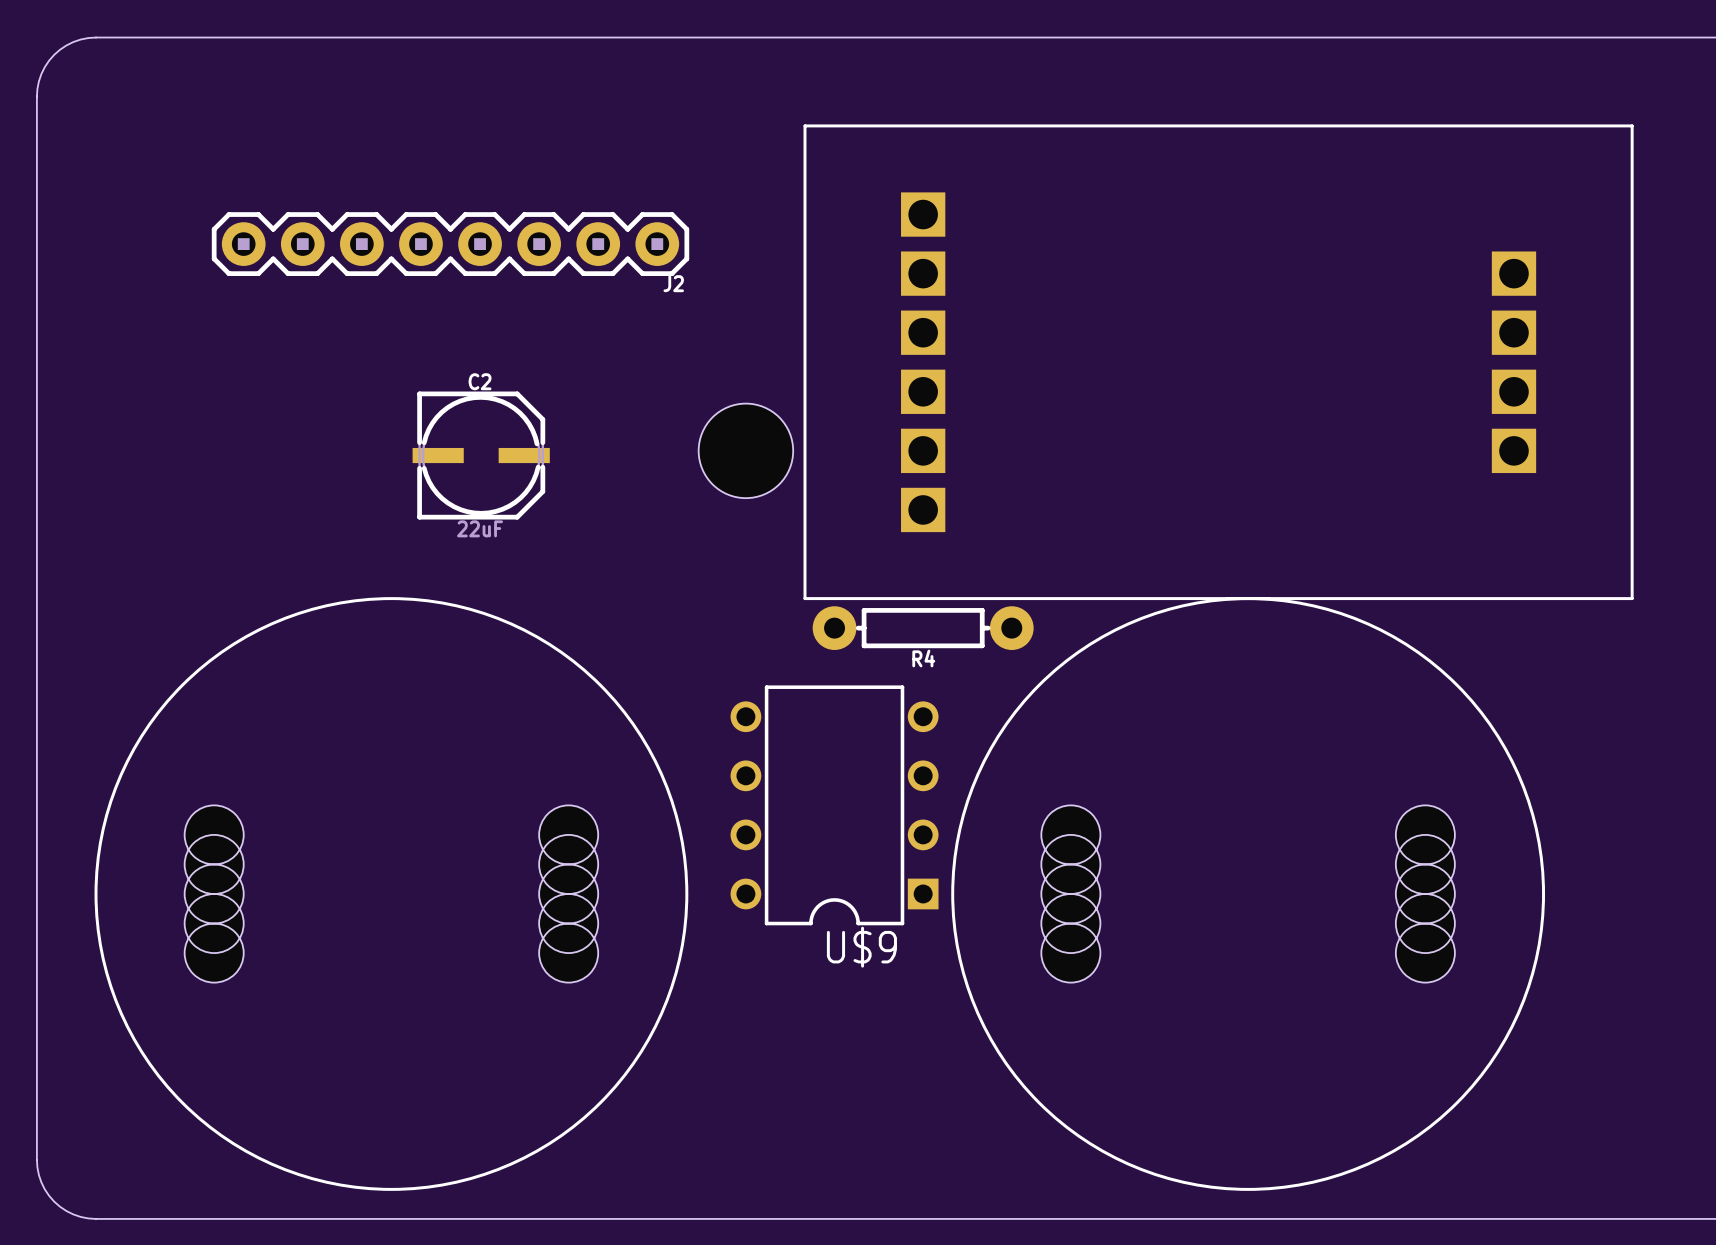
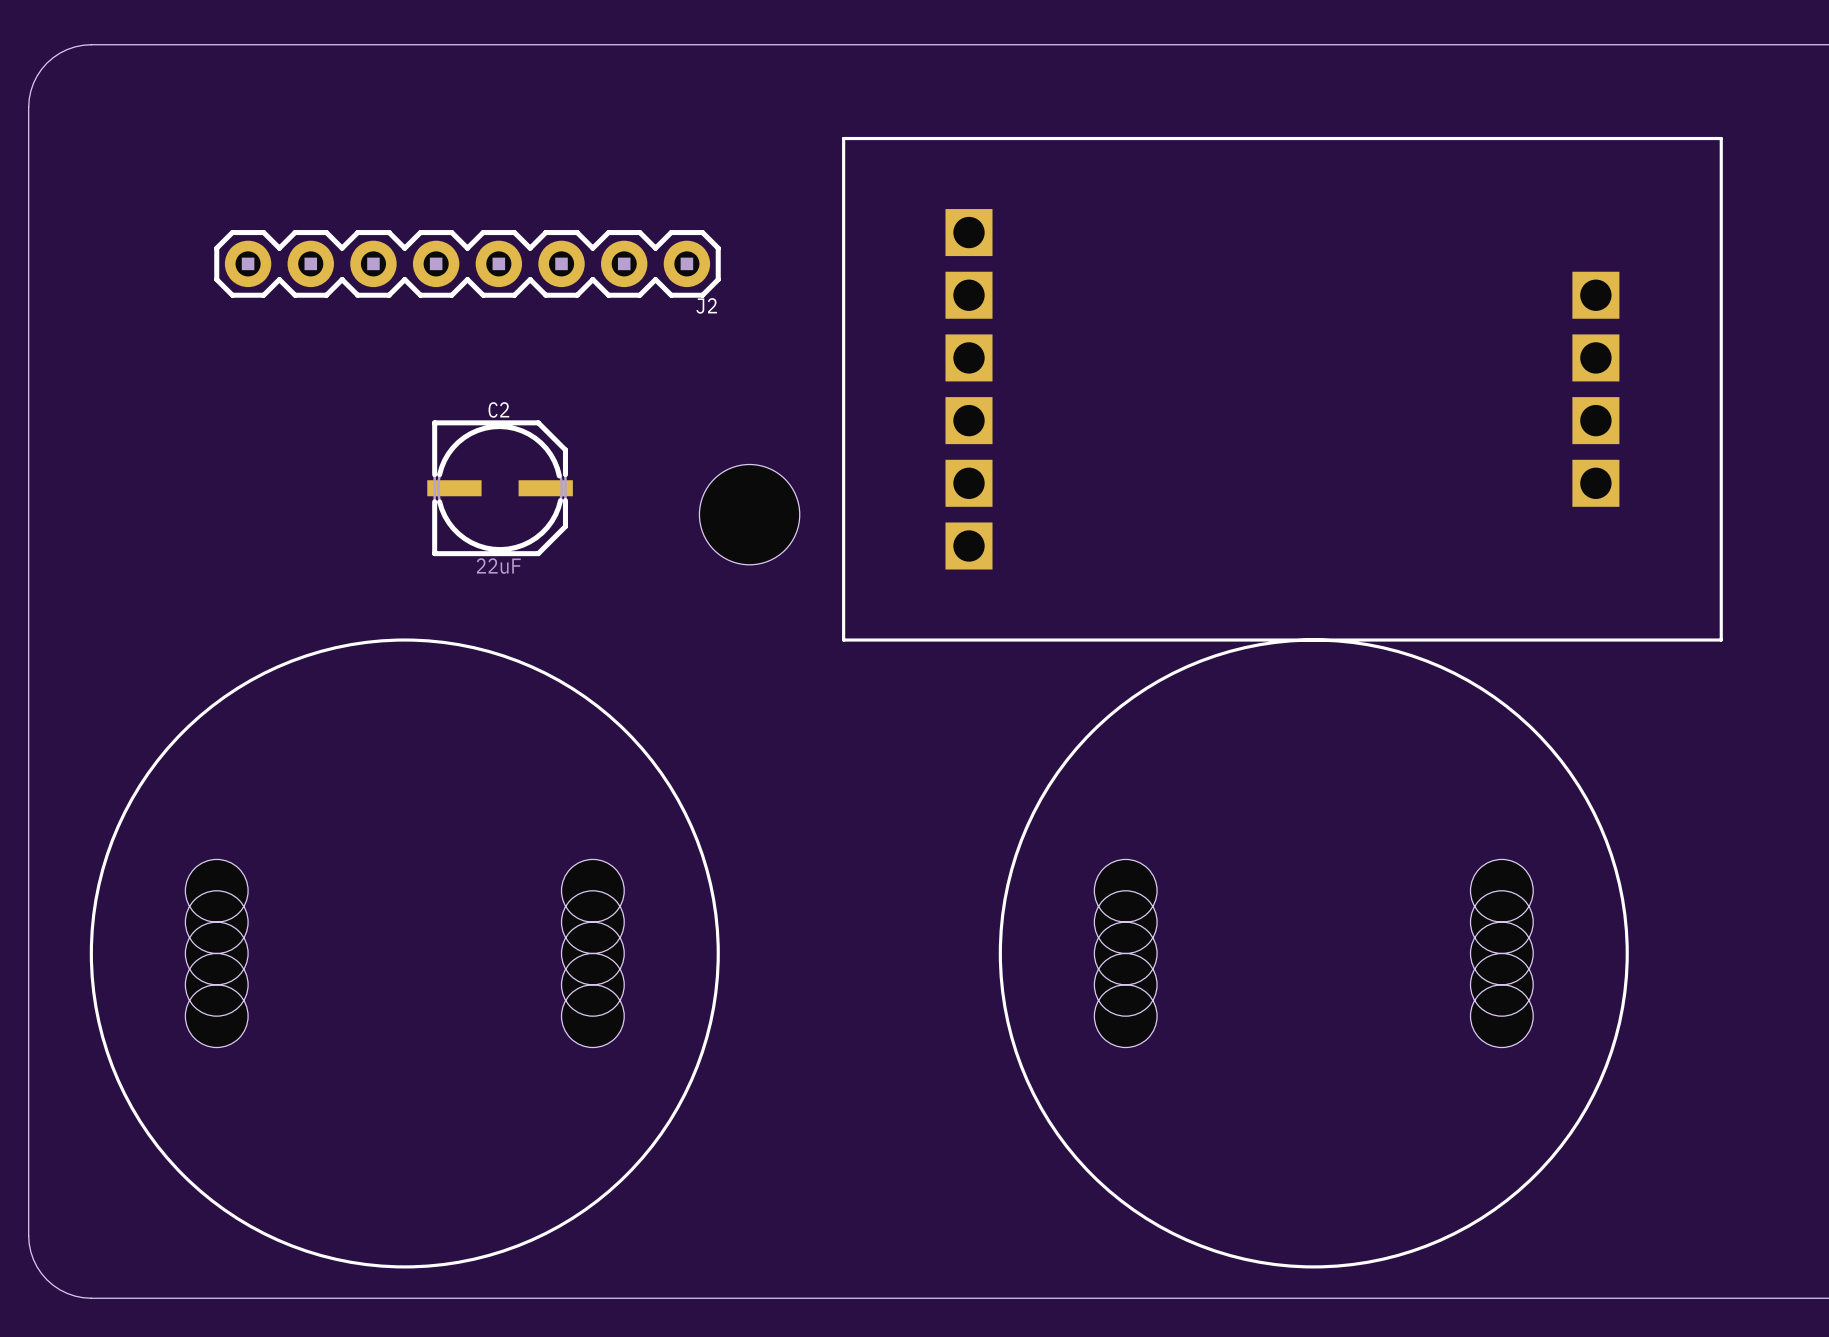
part position: (745, 450) -> (749, 514)
R4: (923, 628) -> none
U$9: (834, 805) -> none

